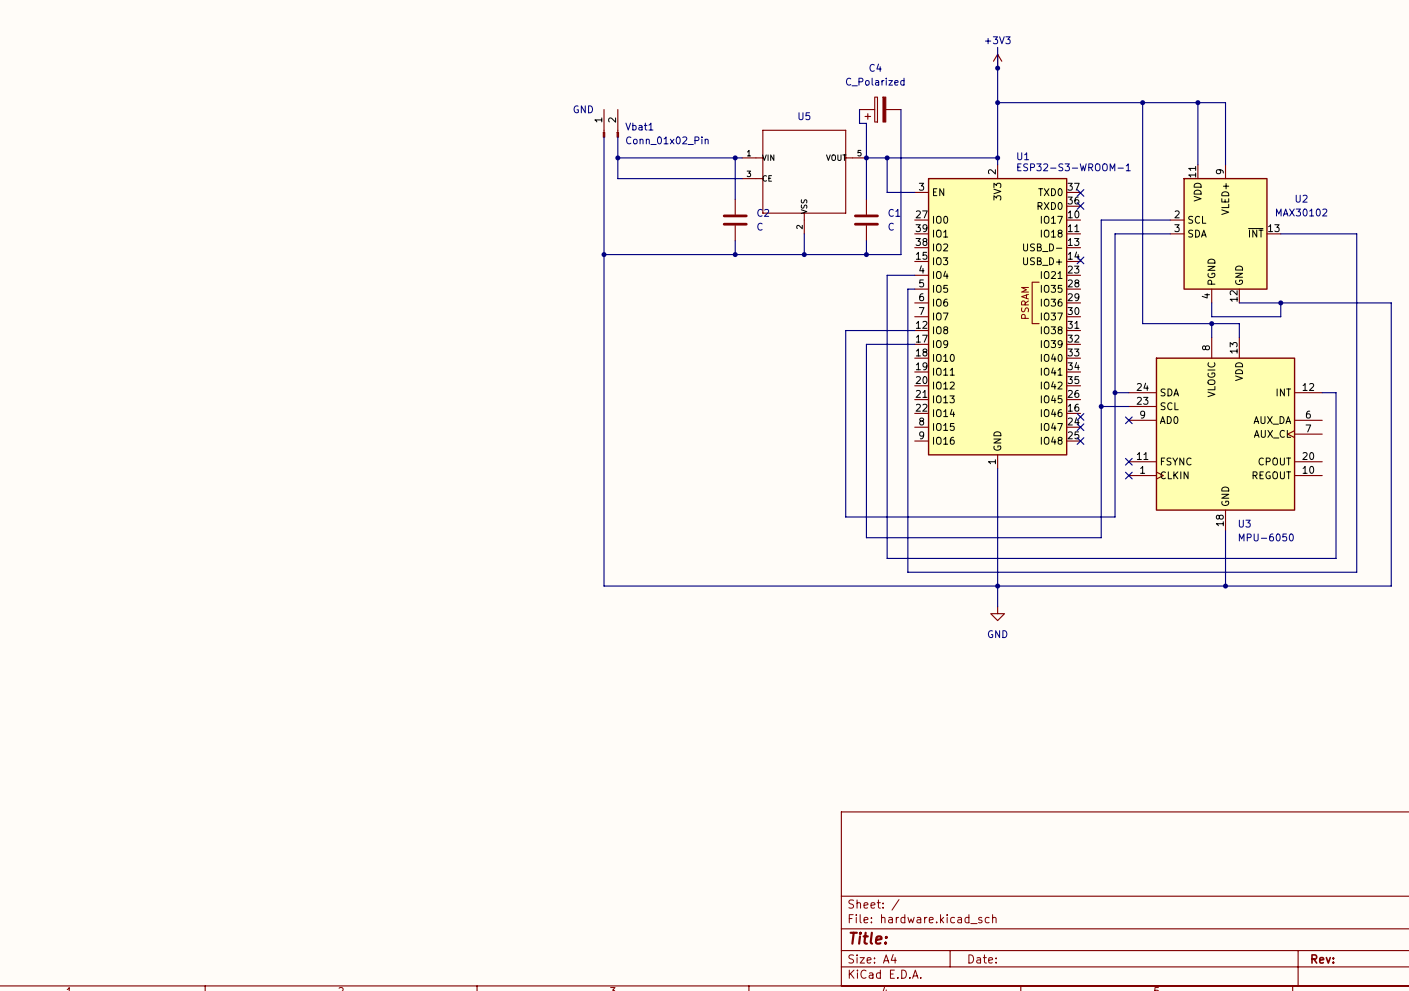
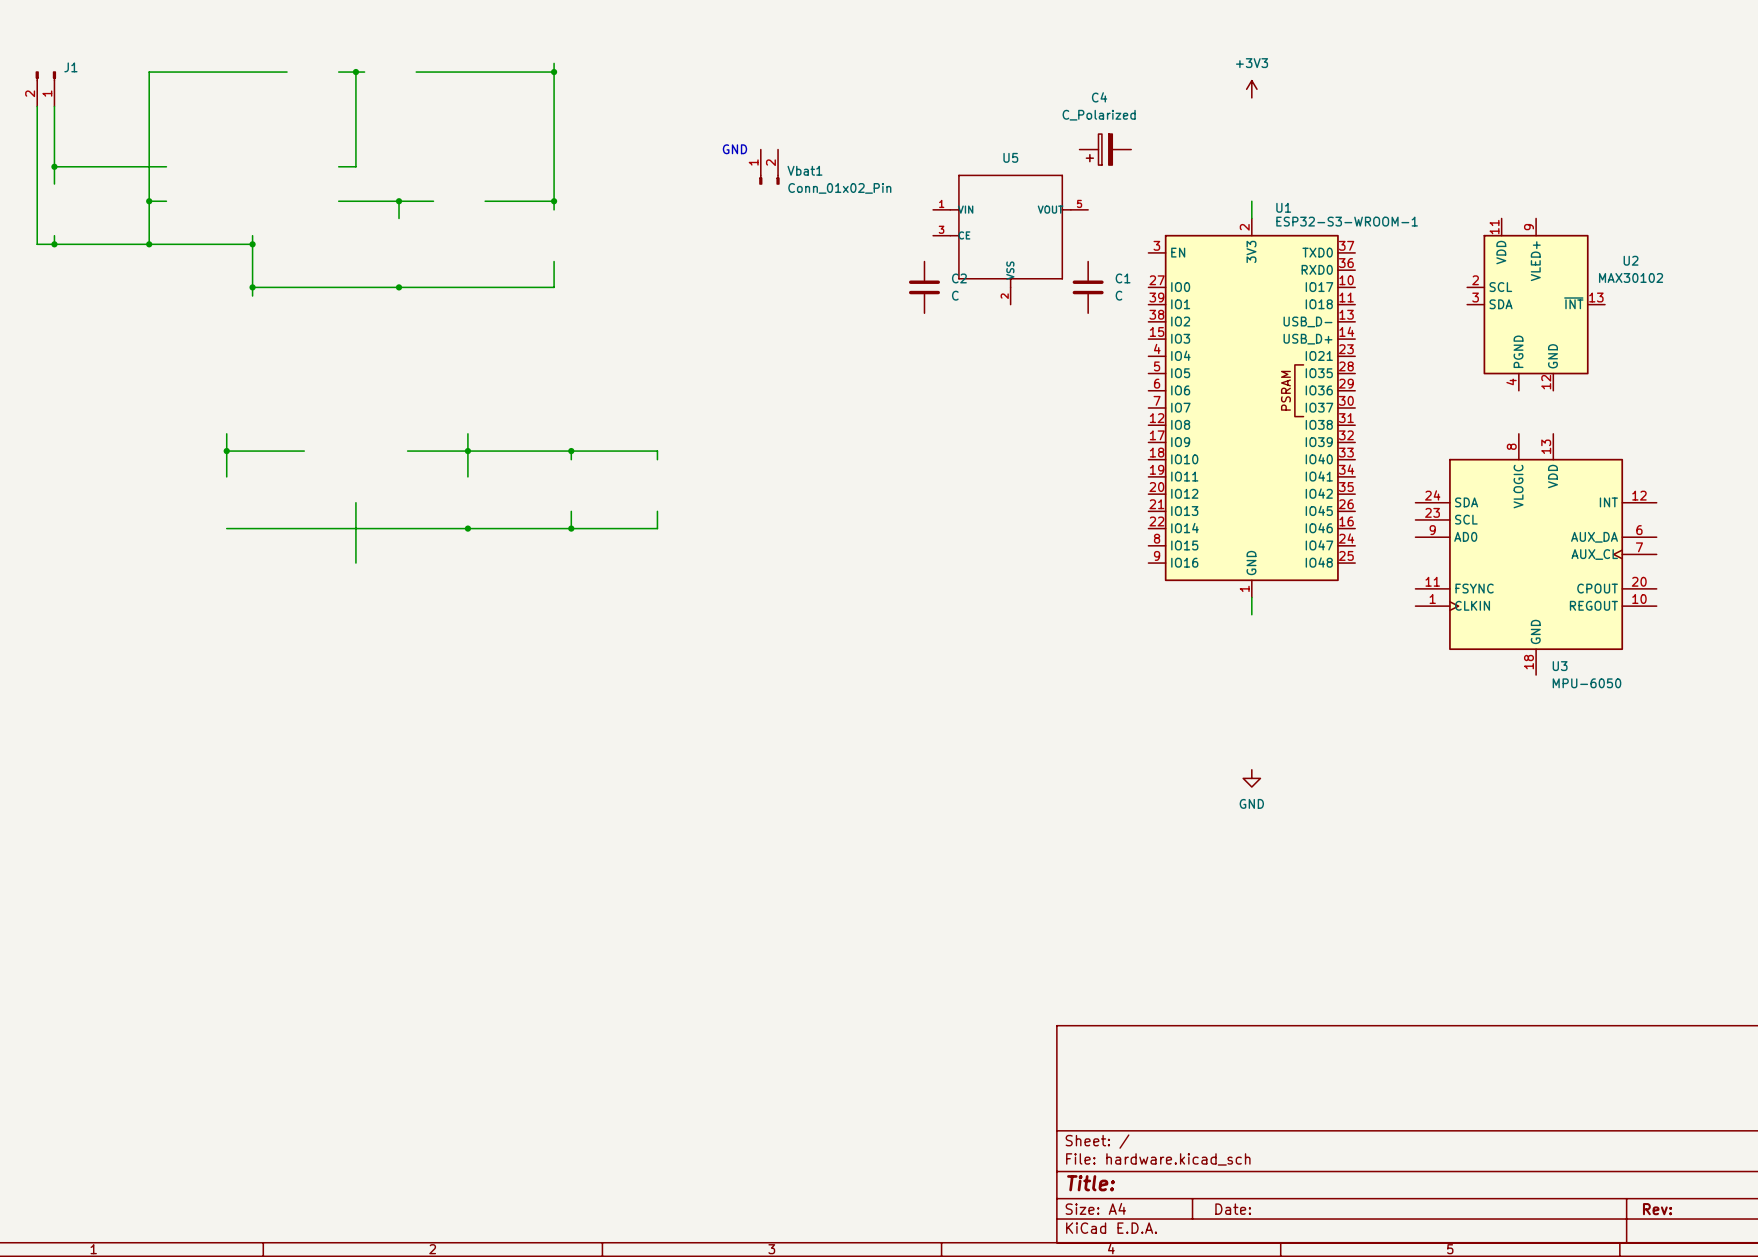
wire: none -> (554, 63) (554, 209)
wire: none -> (287, 72) (149, 72) (149, 244)
wire: none -> (338, 72) (364, 72)
wire: none -> (355, 72) (355, 166) (338, 166)
junction: none -> (355, 72)
wire: none -> (416, 72) (554, 72)
junction: none -> (554, 72)
wire: (997, 47) (997, 151) -> none
J1: none -> (45, 89)
junction: (997, 68) -> none
wire: none -> (37, 106) (37, 244) (252, 244)
wire: none -> (54, 106) (54, 184)
wire: (997, 102) (1225, 102) (1225, 164) -> none
junction: (997, 102) -> none
wire: (1142, 102) (1142, 323) (1239, 323) (1239, 337) -> none
junction: (1142, 102) -> none
wire: (1197, 102) (1197, 164) -> none
junction: (1197, 102) -> none
wire: (859, 109) (859, 123) (866, 123) (866, 199) -> none
wire: (900, 109) (900, 254) (604, 254) -> none
wire: none -> (54, 166) (166, 166)
junction: none -> (54, 166)
wire: (604, 137) (604, 586) (1391, 586) (1391, 302) (1239, 302) -> none
wire: (617, 137) (617, 178) (742, 178) -> none
wire: none -> (149, 201) (166, 201)
junction: none -> (149, 201)
wire: none -> (338, 201) (433, 201)
wire: none -> (399, 201) (399, 218)
junction: none -> (399, 201)
wire: none -> (485, 201) (554, 201)
junction: none -> (554, 201)
wire: (617, 157) (742, 157) -> none
junction: (617, 157) -> none
wire: (735, 157) (735, 199) -> none
junction: (735, 157) -> none
wire: (866, 157) (997, 157) -> none
junction: (866, 157) -> none
wire: (887, 157) (887, 192) (914, 192) -> none
junction: (887, 157) -> none
junction: (997, 157) -> none
wire: none -> (54, 235) (54, 244)
wire: none -> (252, 235) (252, 296)
junction: none -> (54, 244)
junction: none -> (149, 244)
junction: none -> (252, 244)
no-connect mark: (1080, 192) -> none
wire: none -> (554, 261) (554, 287) (252, 287)
no-connect mark: (1080, 205) -> none
junction: none -> (252, 287)
junction: none -> (399, 287)
wire: (1170, 220) (1101, 220) (1101, 537) (866, 537) (866, 344) (914, 344) -> none
wire: (804, 233) (804, 254) -> none
wire: (1170, 233) (1115, 233) (1115, 516) (845, 516) (845, 330) (914, 330) -> none
wire: (1280, 233) (1356, 233) (1356, 572) (907, 572) (907, 289) (914, 289) -> none
wire: (735, 240) (735, 254) -> none
wire: (866, 240) (866, 254) -> none
junction: (604, 254) -> none
junction: (735, 254) -> none
junction: (804, 254) -> none
junction: (866, 254) -> none
no-connect mark: (1080, 260) -> none
wire: (914, 275) (887, 275) (887, 558) (1336, 558) (1336, 392) (1322, 392) -> none
wire: (1211, 302) (1211, 316) (1280, 316) (1280, 302) -> none
junction: (1280, 302) -> none
wire: (1211, 323) (1211, 337) -> none
junction: (1211, 323) -> none
wire: none -> (226, 433) (226, 476)
wire: none -> (467, 433) (467, 476)
wire: none -> (226, 451) (304, 451)
junction: none -> (226, 451)
wire: none -> (407, 451) (657, 451) (657, 459)
junction: none -> (467, 451)
wire: none -> (571, 451) (571, 459)
junction: none -> (571, 451)
wire: none -> (355, 502) (355, 563)
wire: (1115, 392) (1128, 392) -> none
junction: (1115, 392) -> none
wire: none -> (571, 511) (571, 528)
wire: none -> (657, 511) (657, 528) (226, 528)
wire: (1101, 406) (1128, 406) -> none
junction: (1101, 406) -> none
junction: none -> (467, 528)
junction: none -> (571, 528)
no-connect mark: (1080, 416) -> none
no-connect mark: (1128, 420) -> none
no-connect mark: (1080, 427) -> none
no-connect mark: (1080, 441) -> none
no-connect mark: (1128, 461) -> none
no-connect mark: (1128, 475) -> none
wire: (997, 482) (997, 606) -> none
wire: (1225, 530) (1225, 586) -> none
junction: (997, 586) -> none
junction: (1225, 586) -> none

